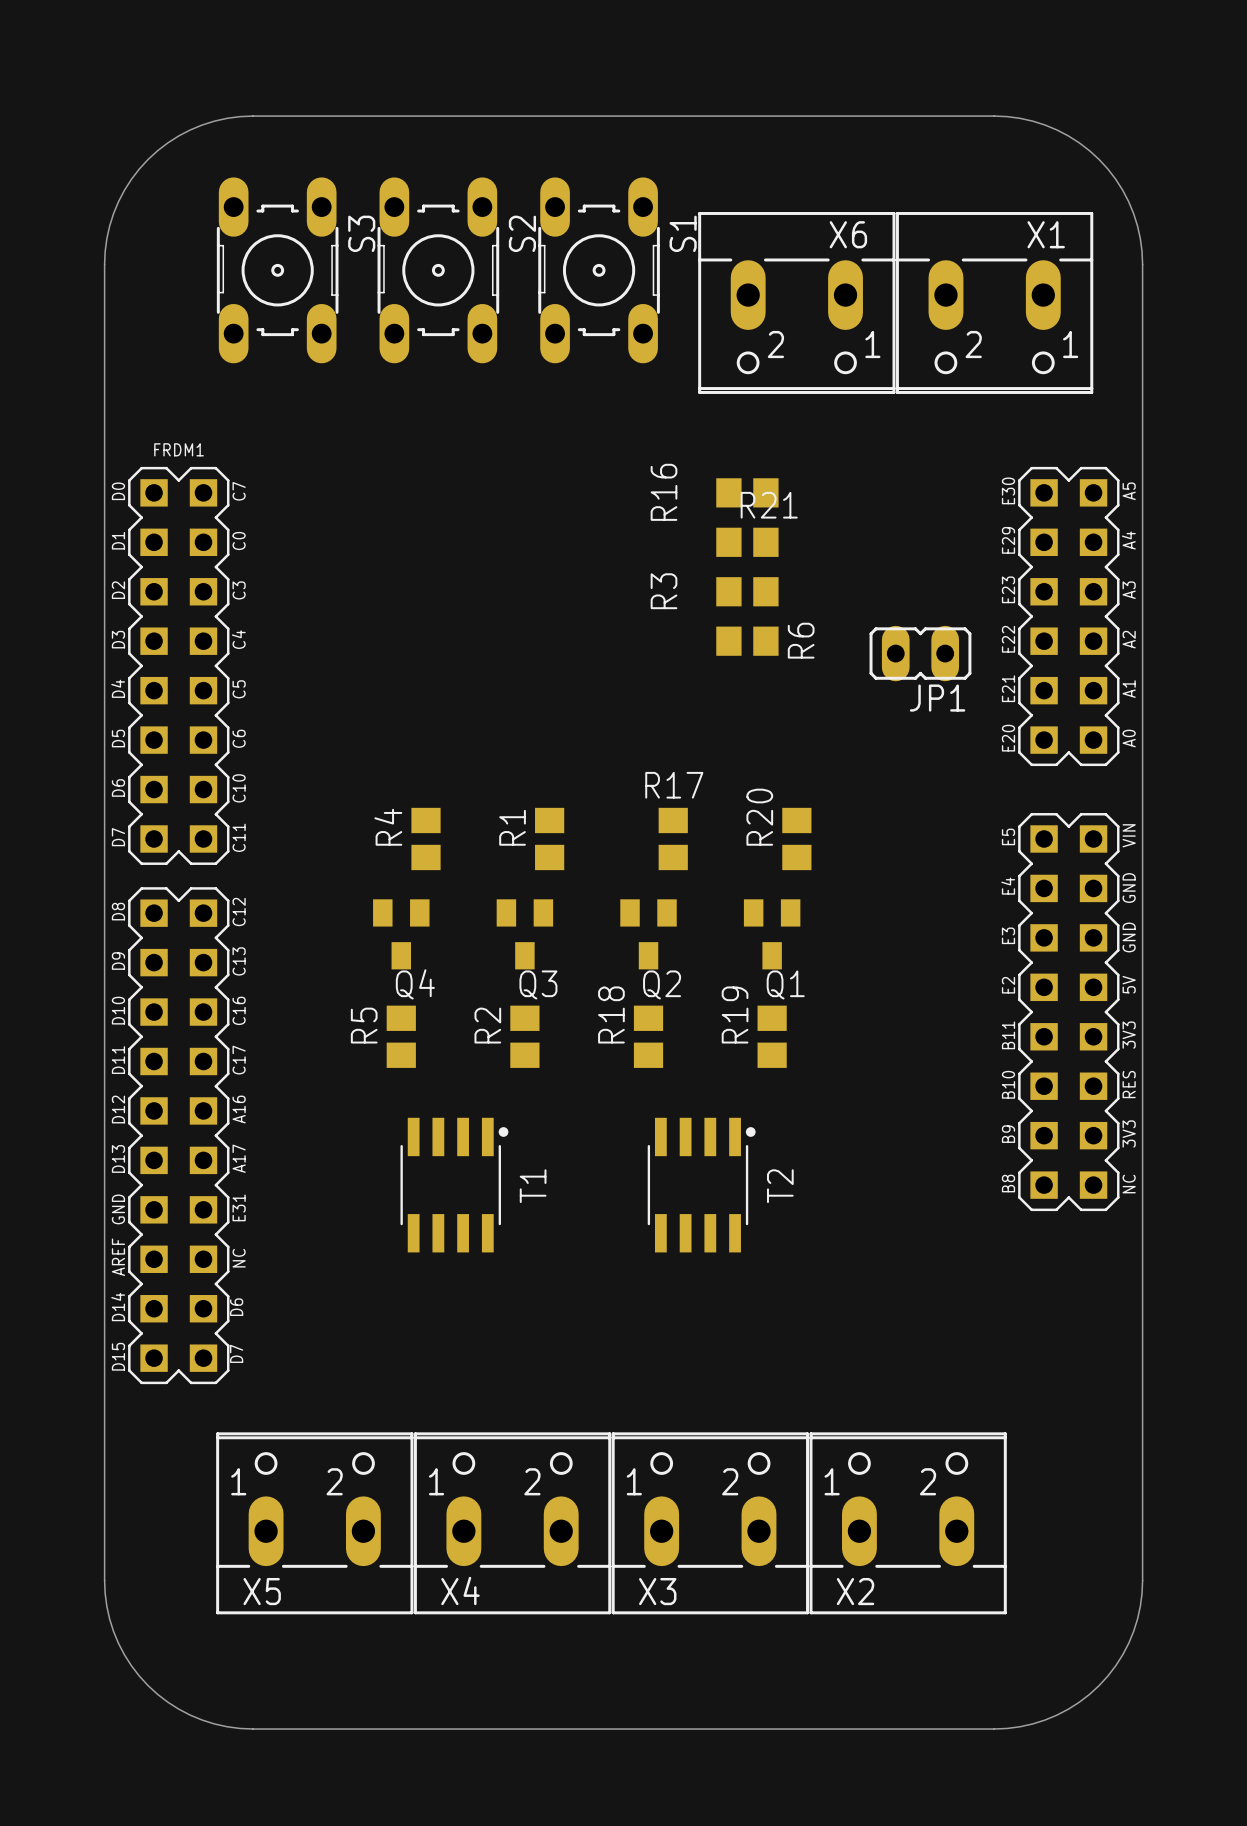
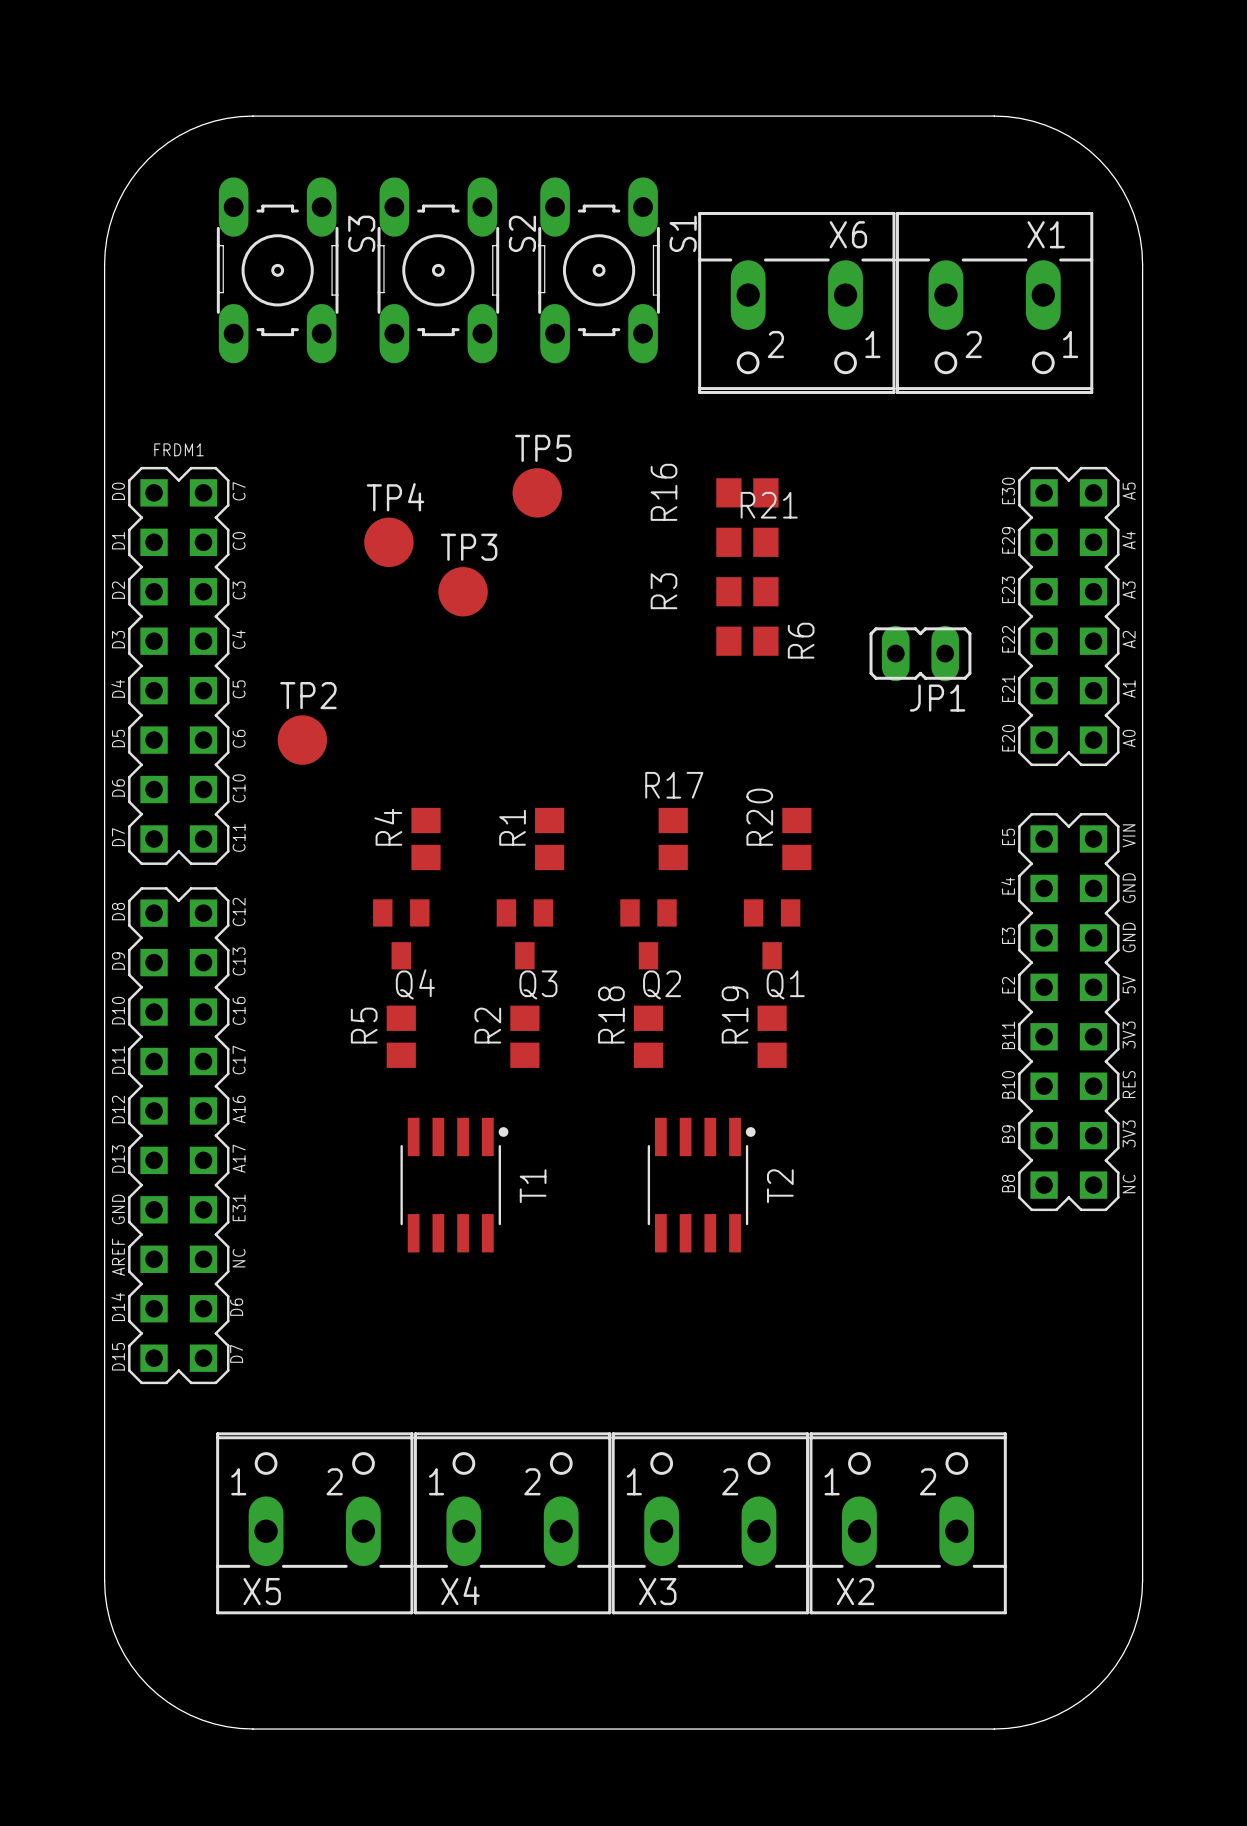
TP5: none -> (537, 492)
TP4: none -> (388, 542)
TP3: none -> (463, 591)
TP2: none -> (302, 740)

